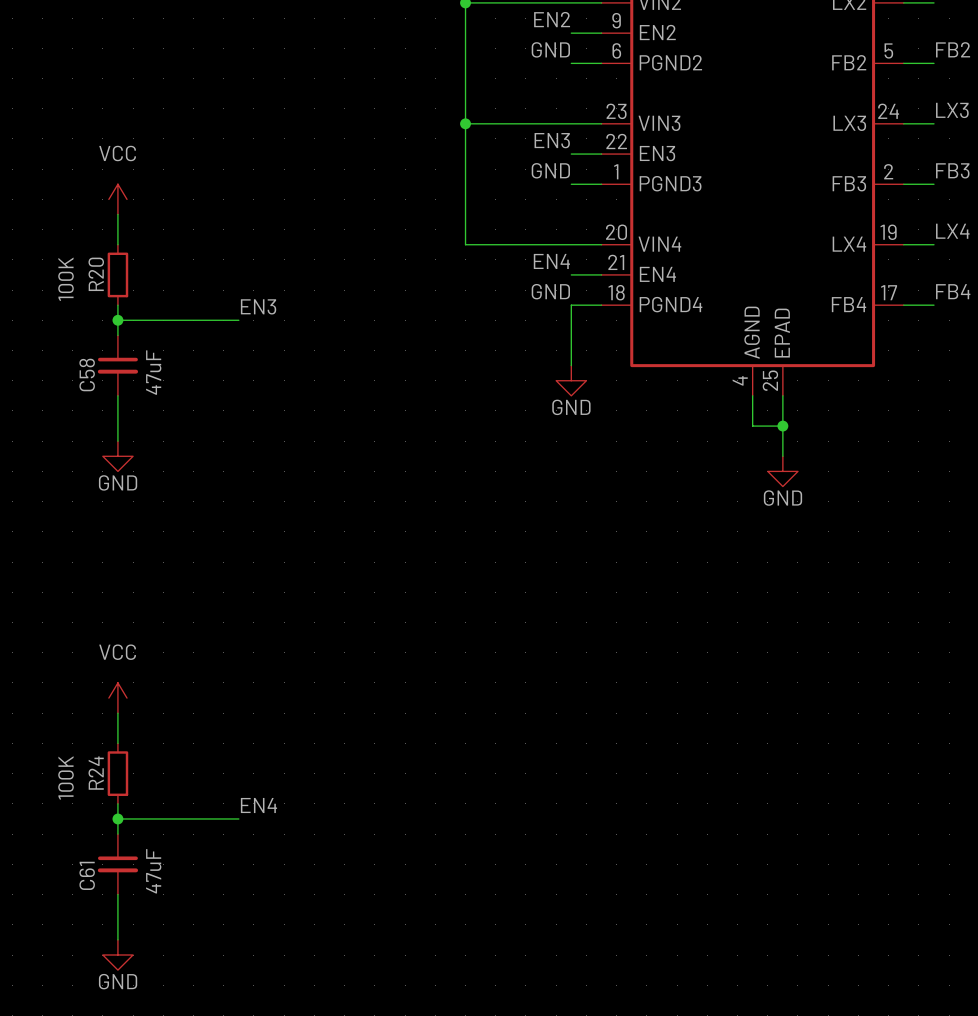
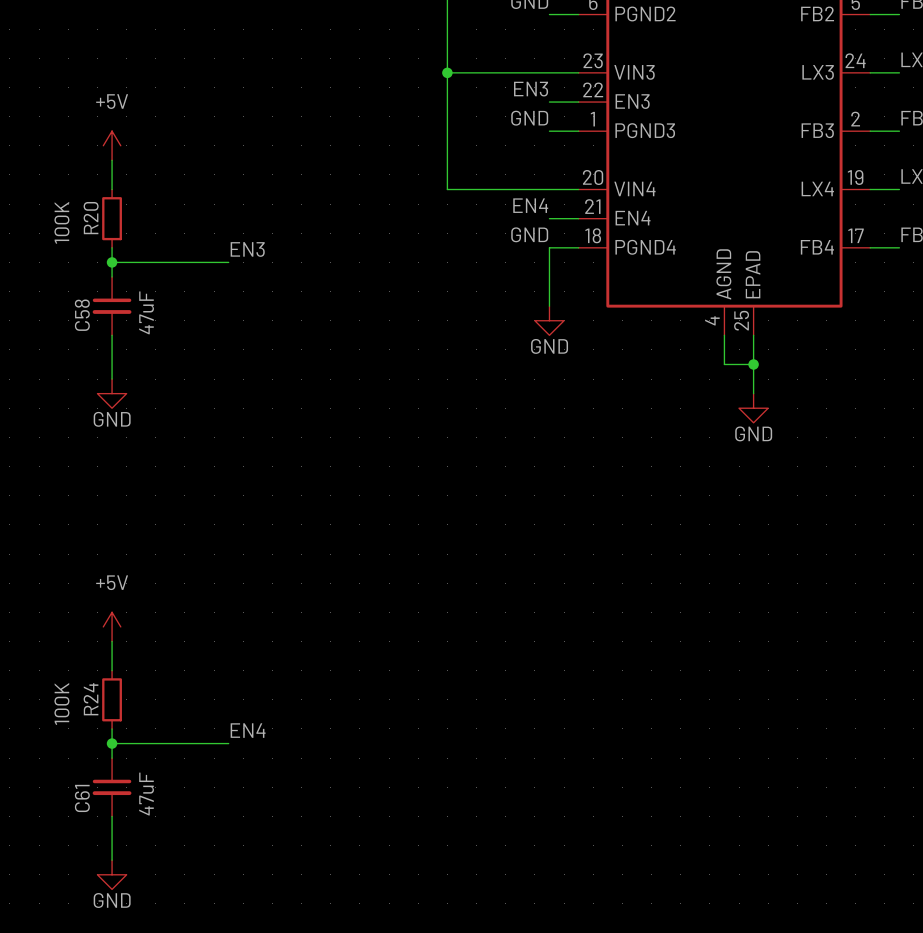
power symbol: VCC (117, 199) -> +5V (112, 145)
power symbol: VCC (117, 698) -> +5V (112, 626)

